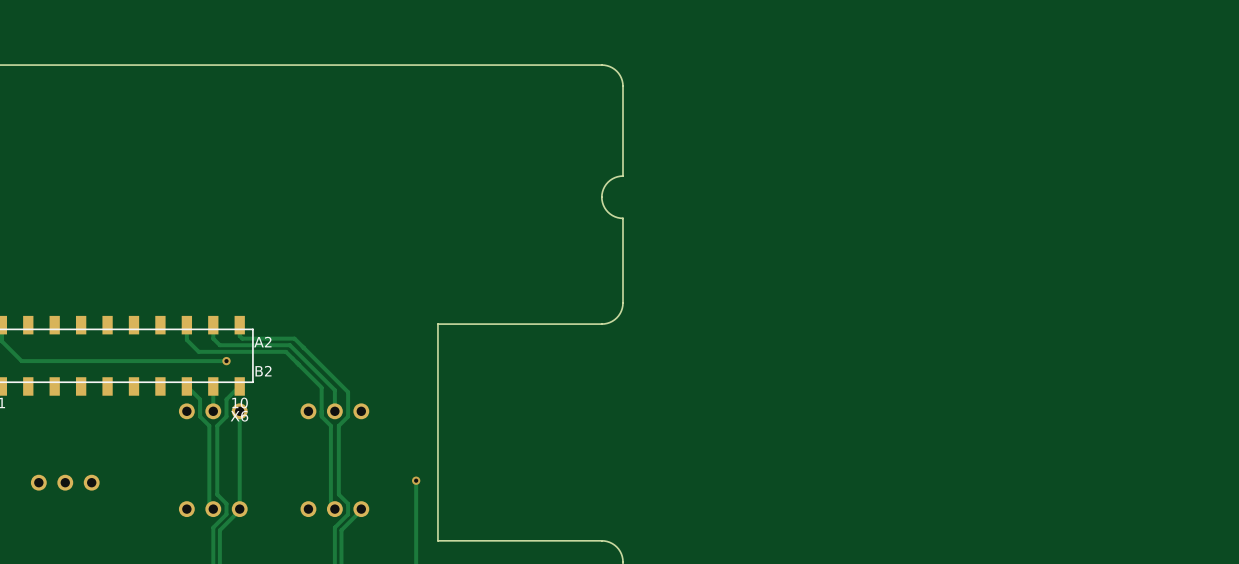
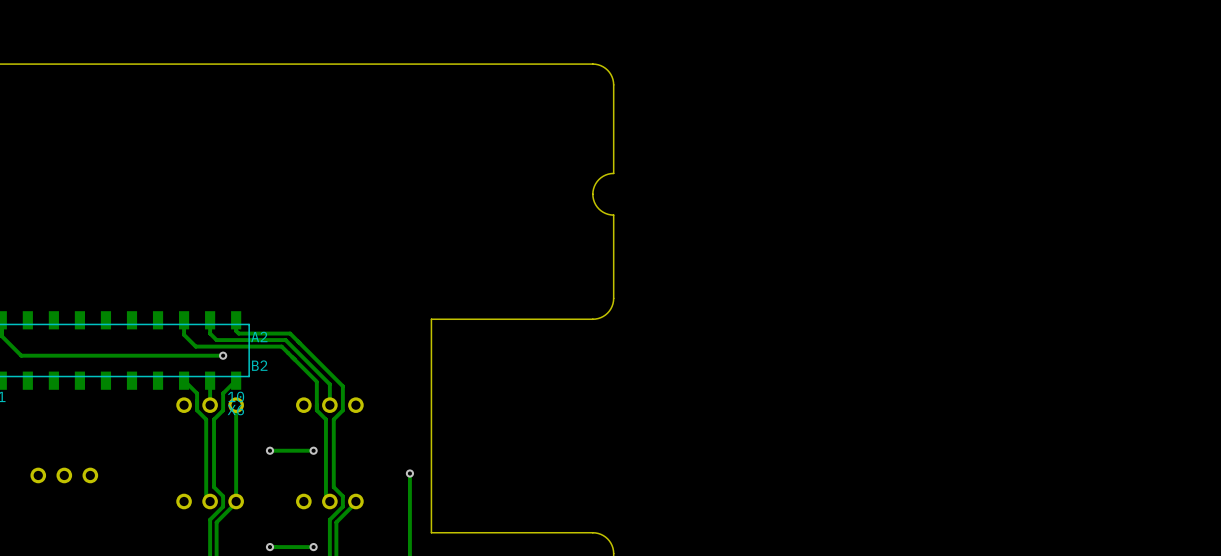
via: none -> (269, 450)
track: none -> (313, 450) (269, 450)
via: none -> (313, 450)
via: none -> (269, 547)
track: none -> (313, 547) (269, 547)
via: none -> (313, 547)

